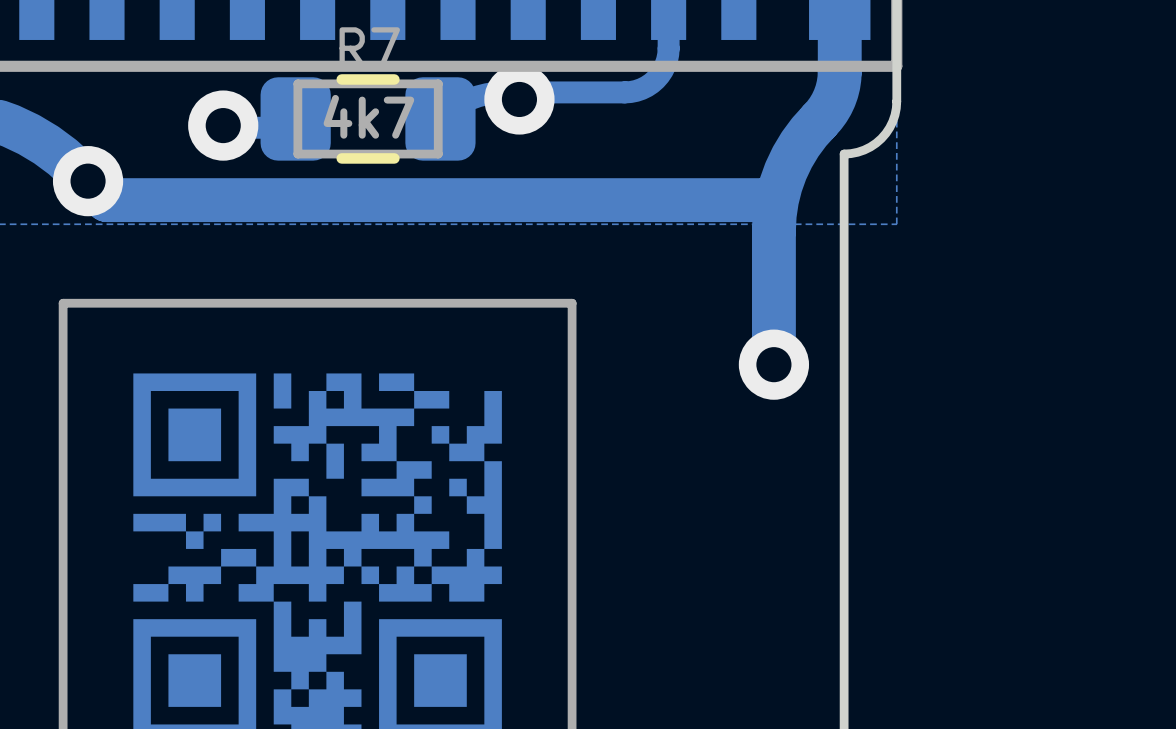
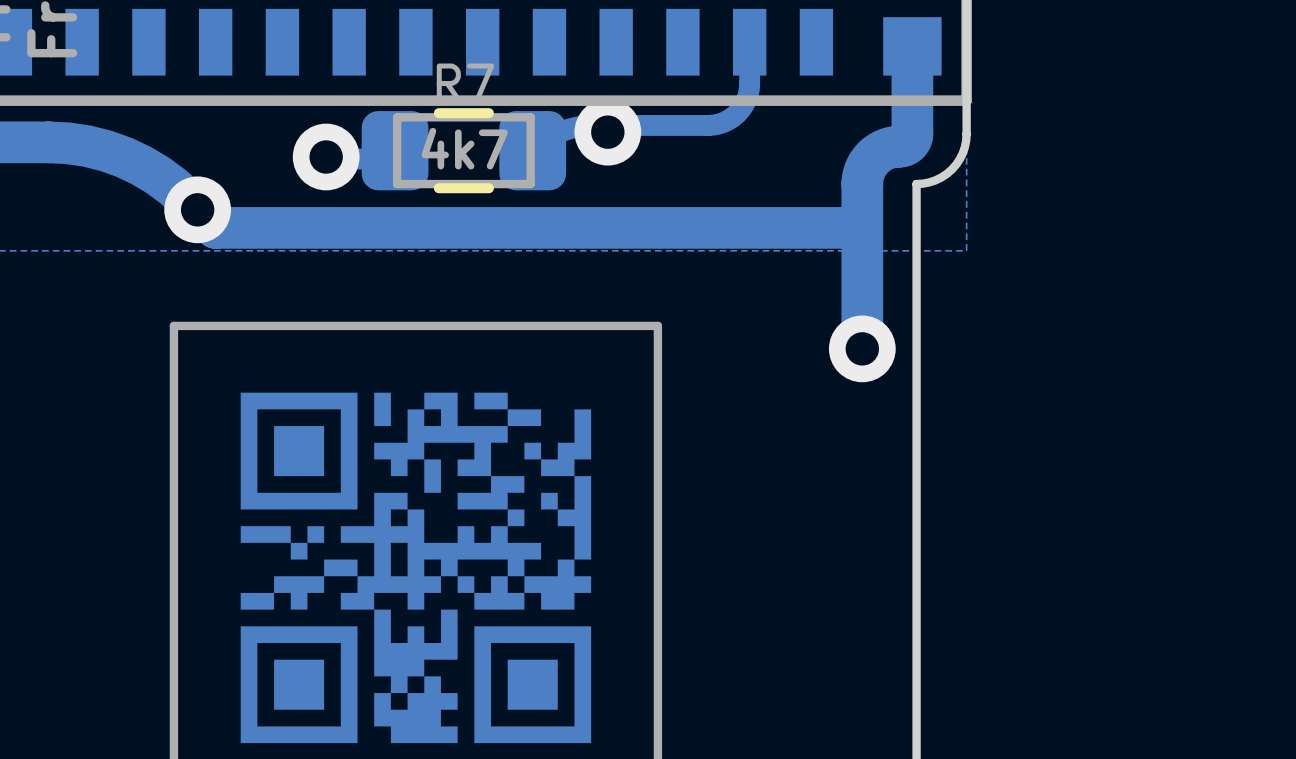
track: (839, 71) (836, 91) (831, 104) (792, 157) (776, 200) (773, 230) (773, 364) -> (912, 105) (912, 135) (909, 141) (904, 145) (887, 148) (876, 154) (868, 164) (863, 175) (862, 348)
via position: (773, 364) -> (862, 348)

